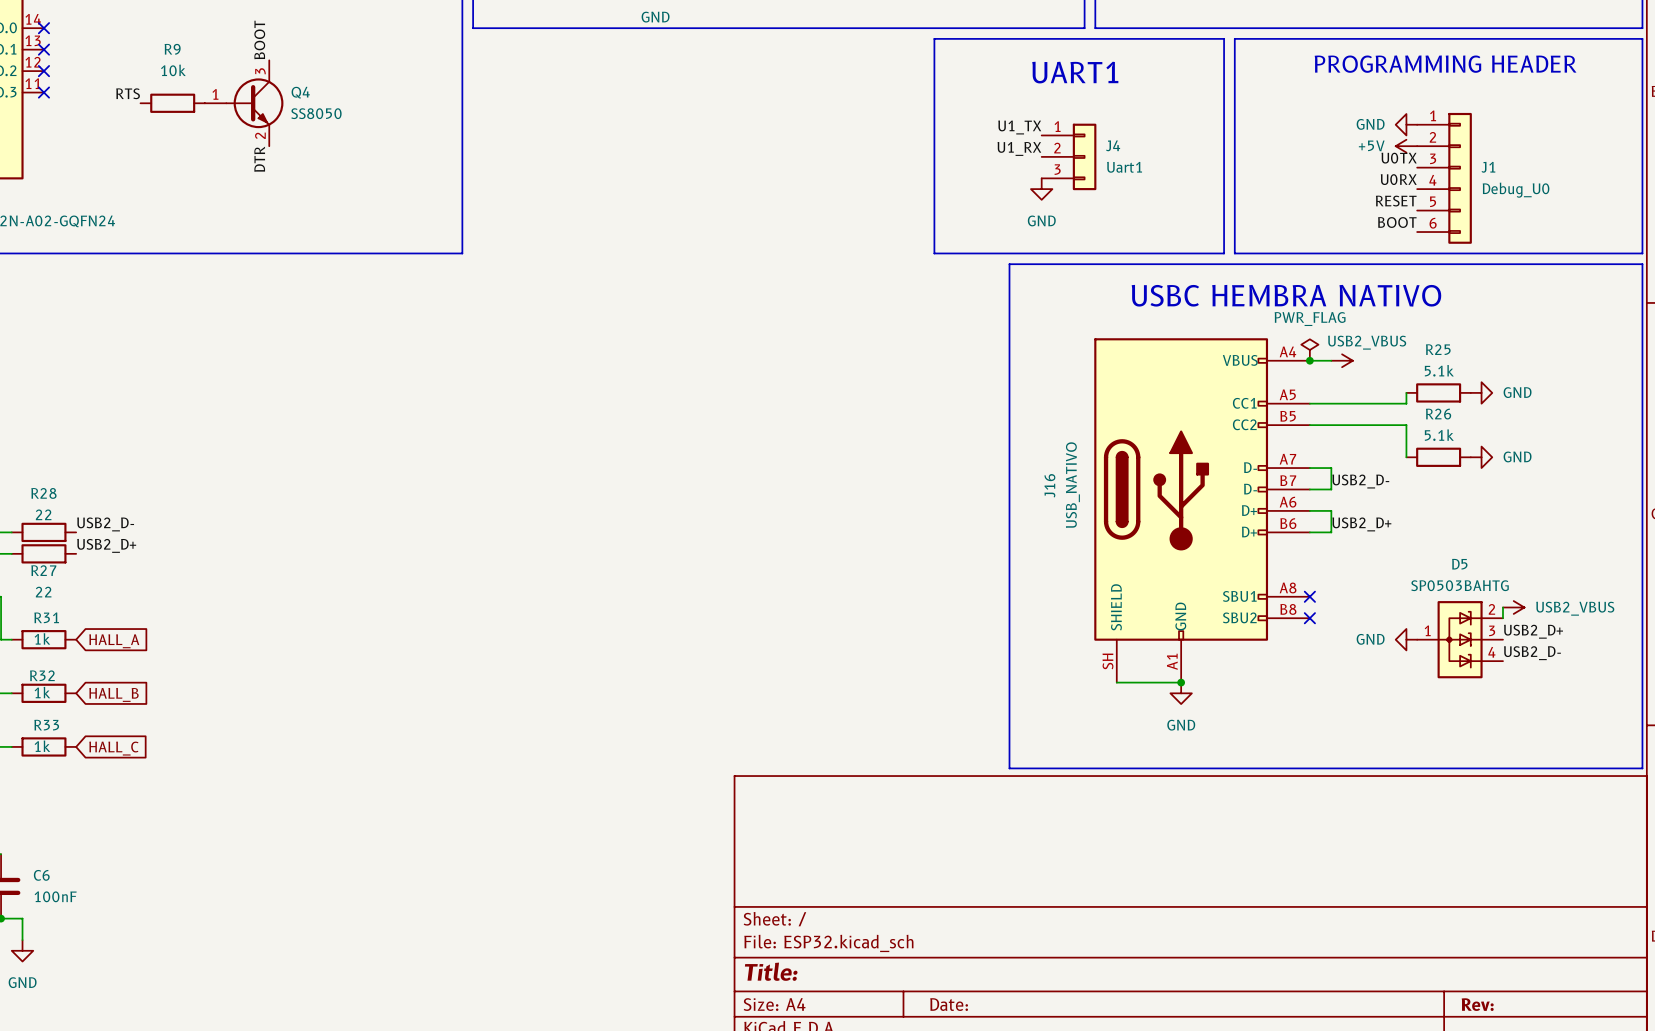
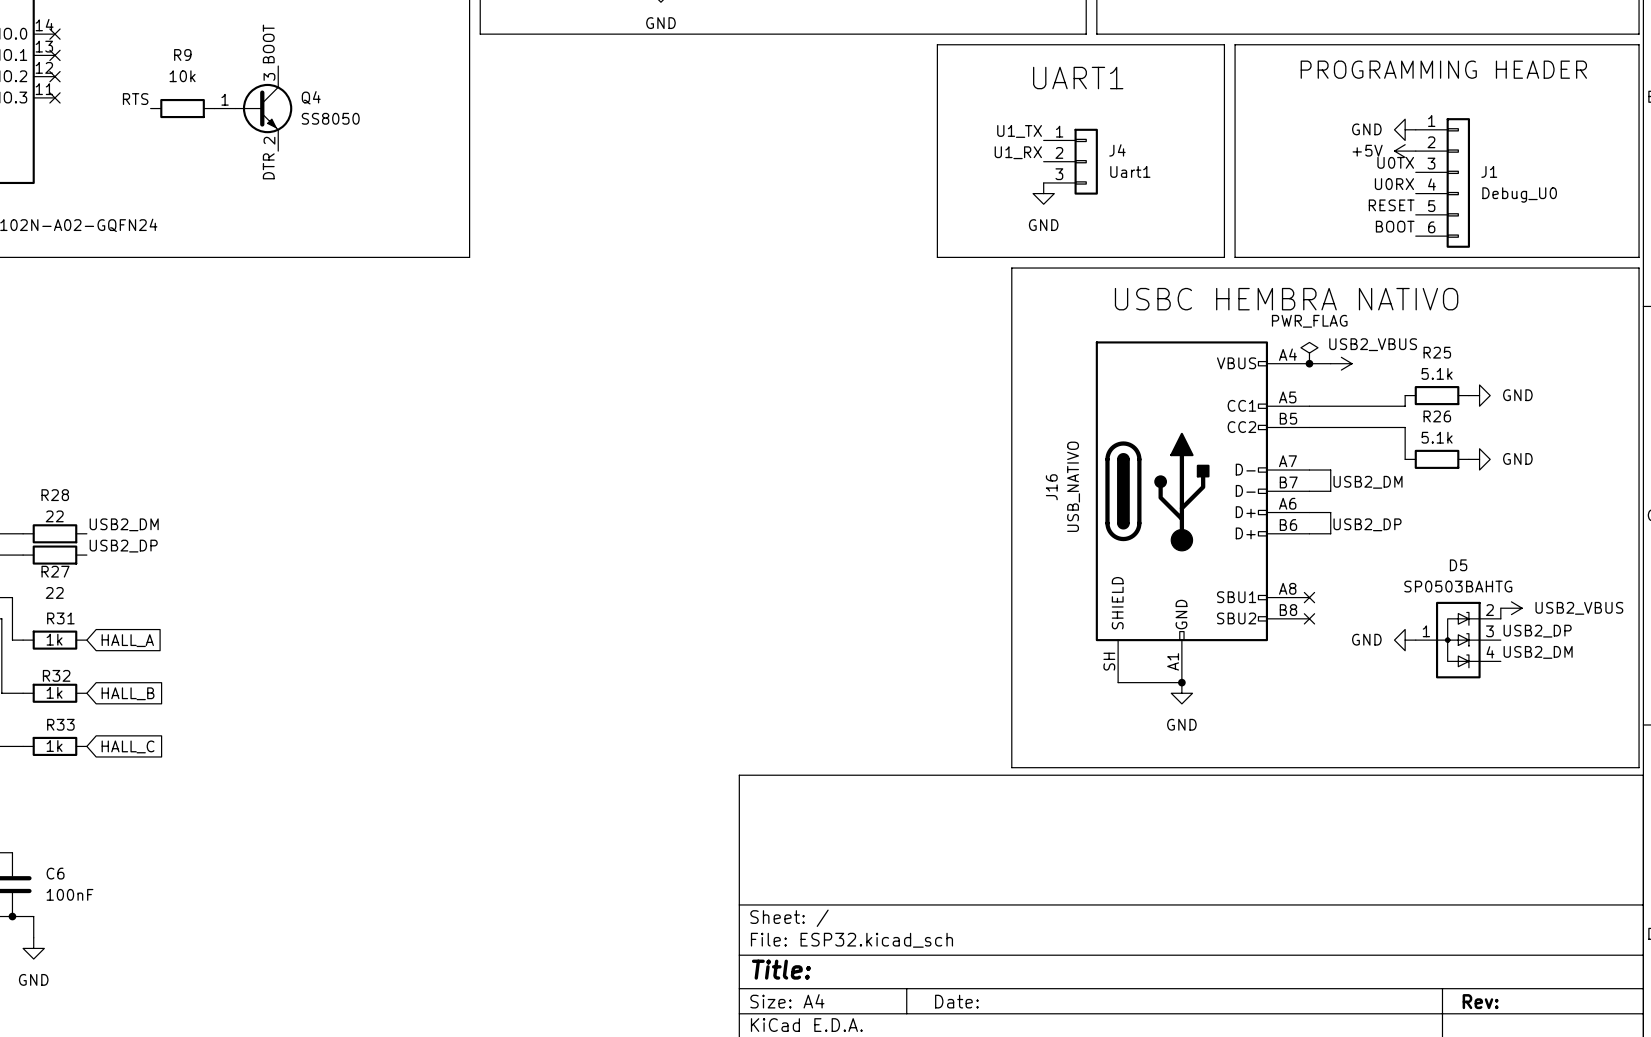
label: USB2_D- (1360, 481) -> USB2_DM (1368, 482)
label: USB2_D- (105, 524) -> USB2_DM (124, 524)
label: USB2_D+ (1361, 524) -> USB2_DP (1367, 524)
label: USB2_D+ (106, 545) -> USB2_DP (123, 546)
label: USB2_D+ (1533, 631) -> USB2_DP (1537, 631)
label: USB2_D- (1532, 653) -> USB2_DM (1538, 652)

